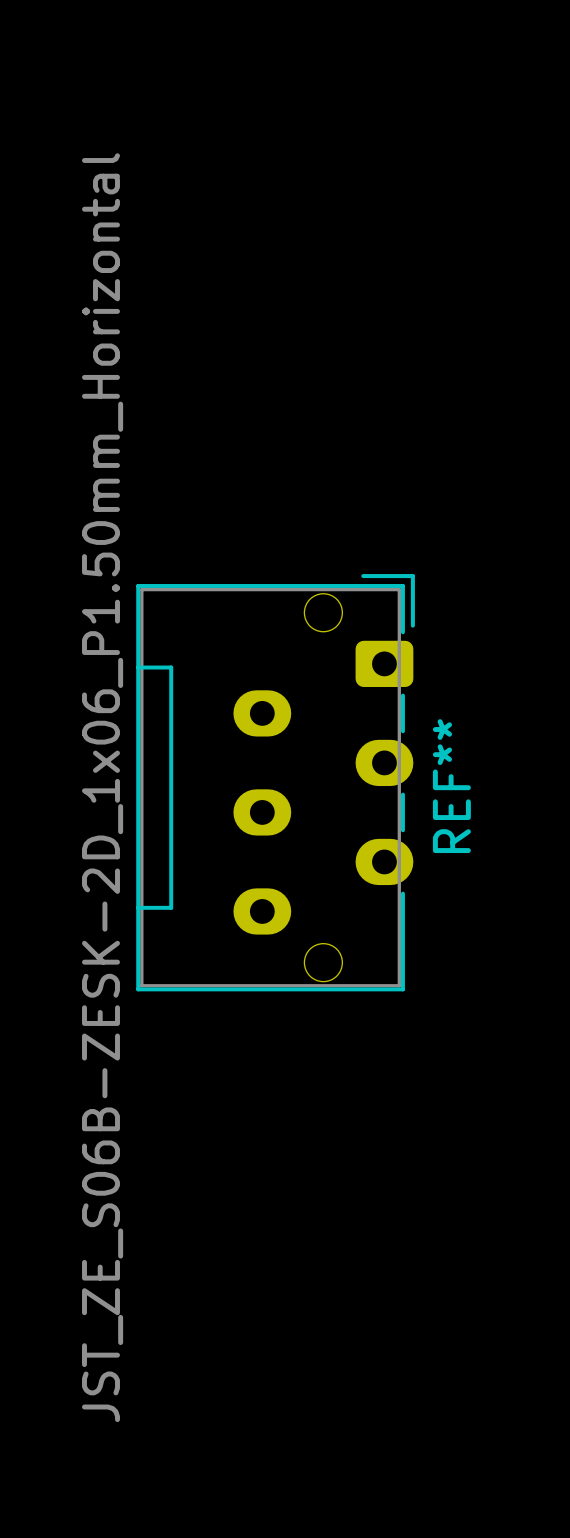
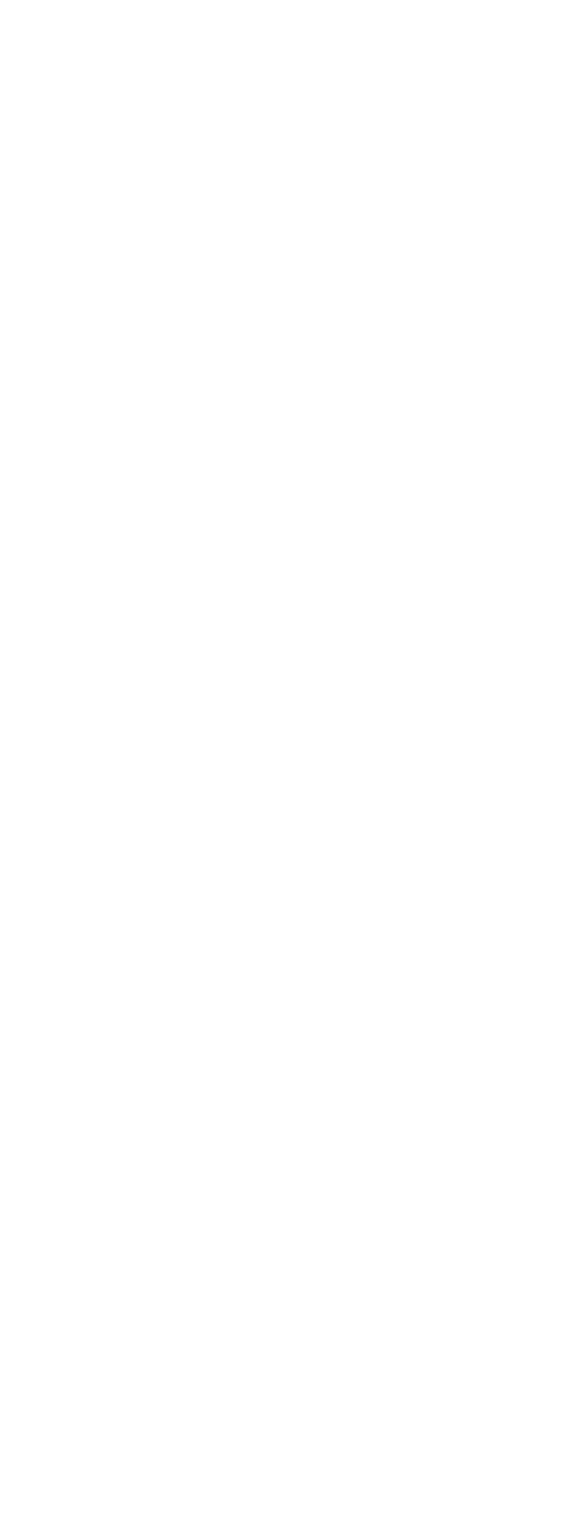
REF**: JST_ZE_S06B-ZESK-2D_1x06_P1.50mm_Horizontal (275, 782) -> none

